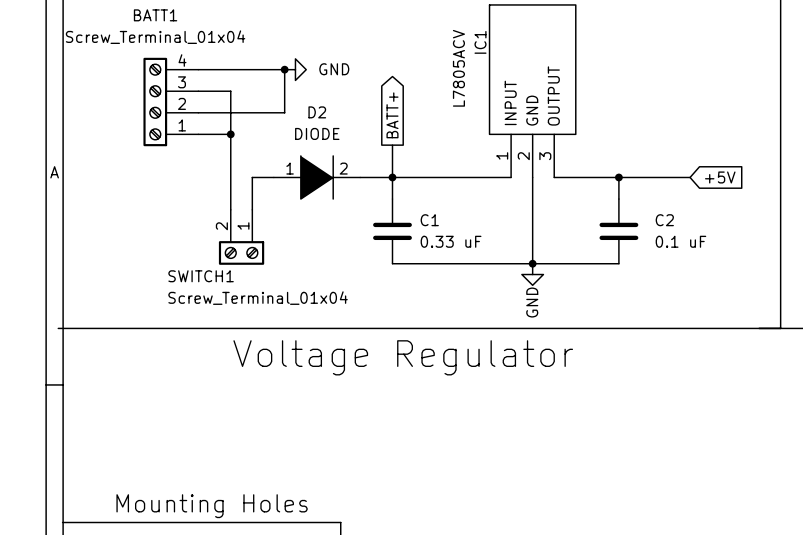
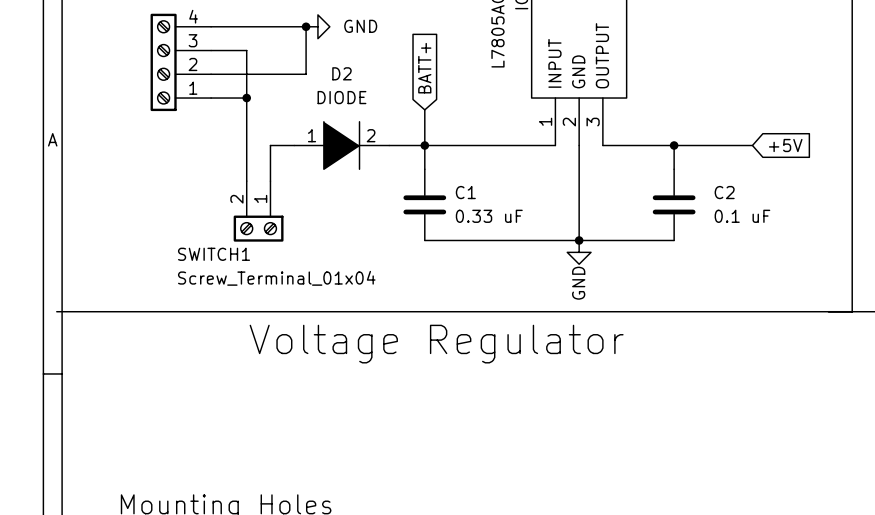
global label shape: output (392, 115) -> input (424, 68)

